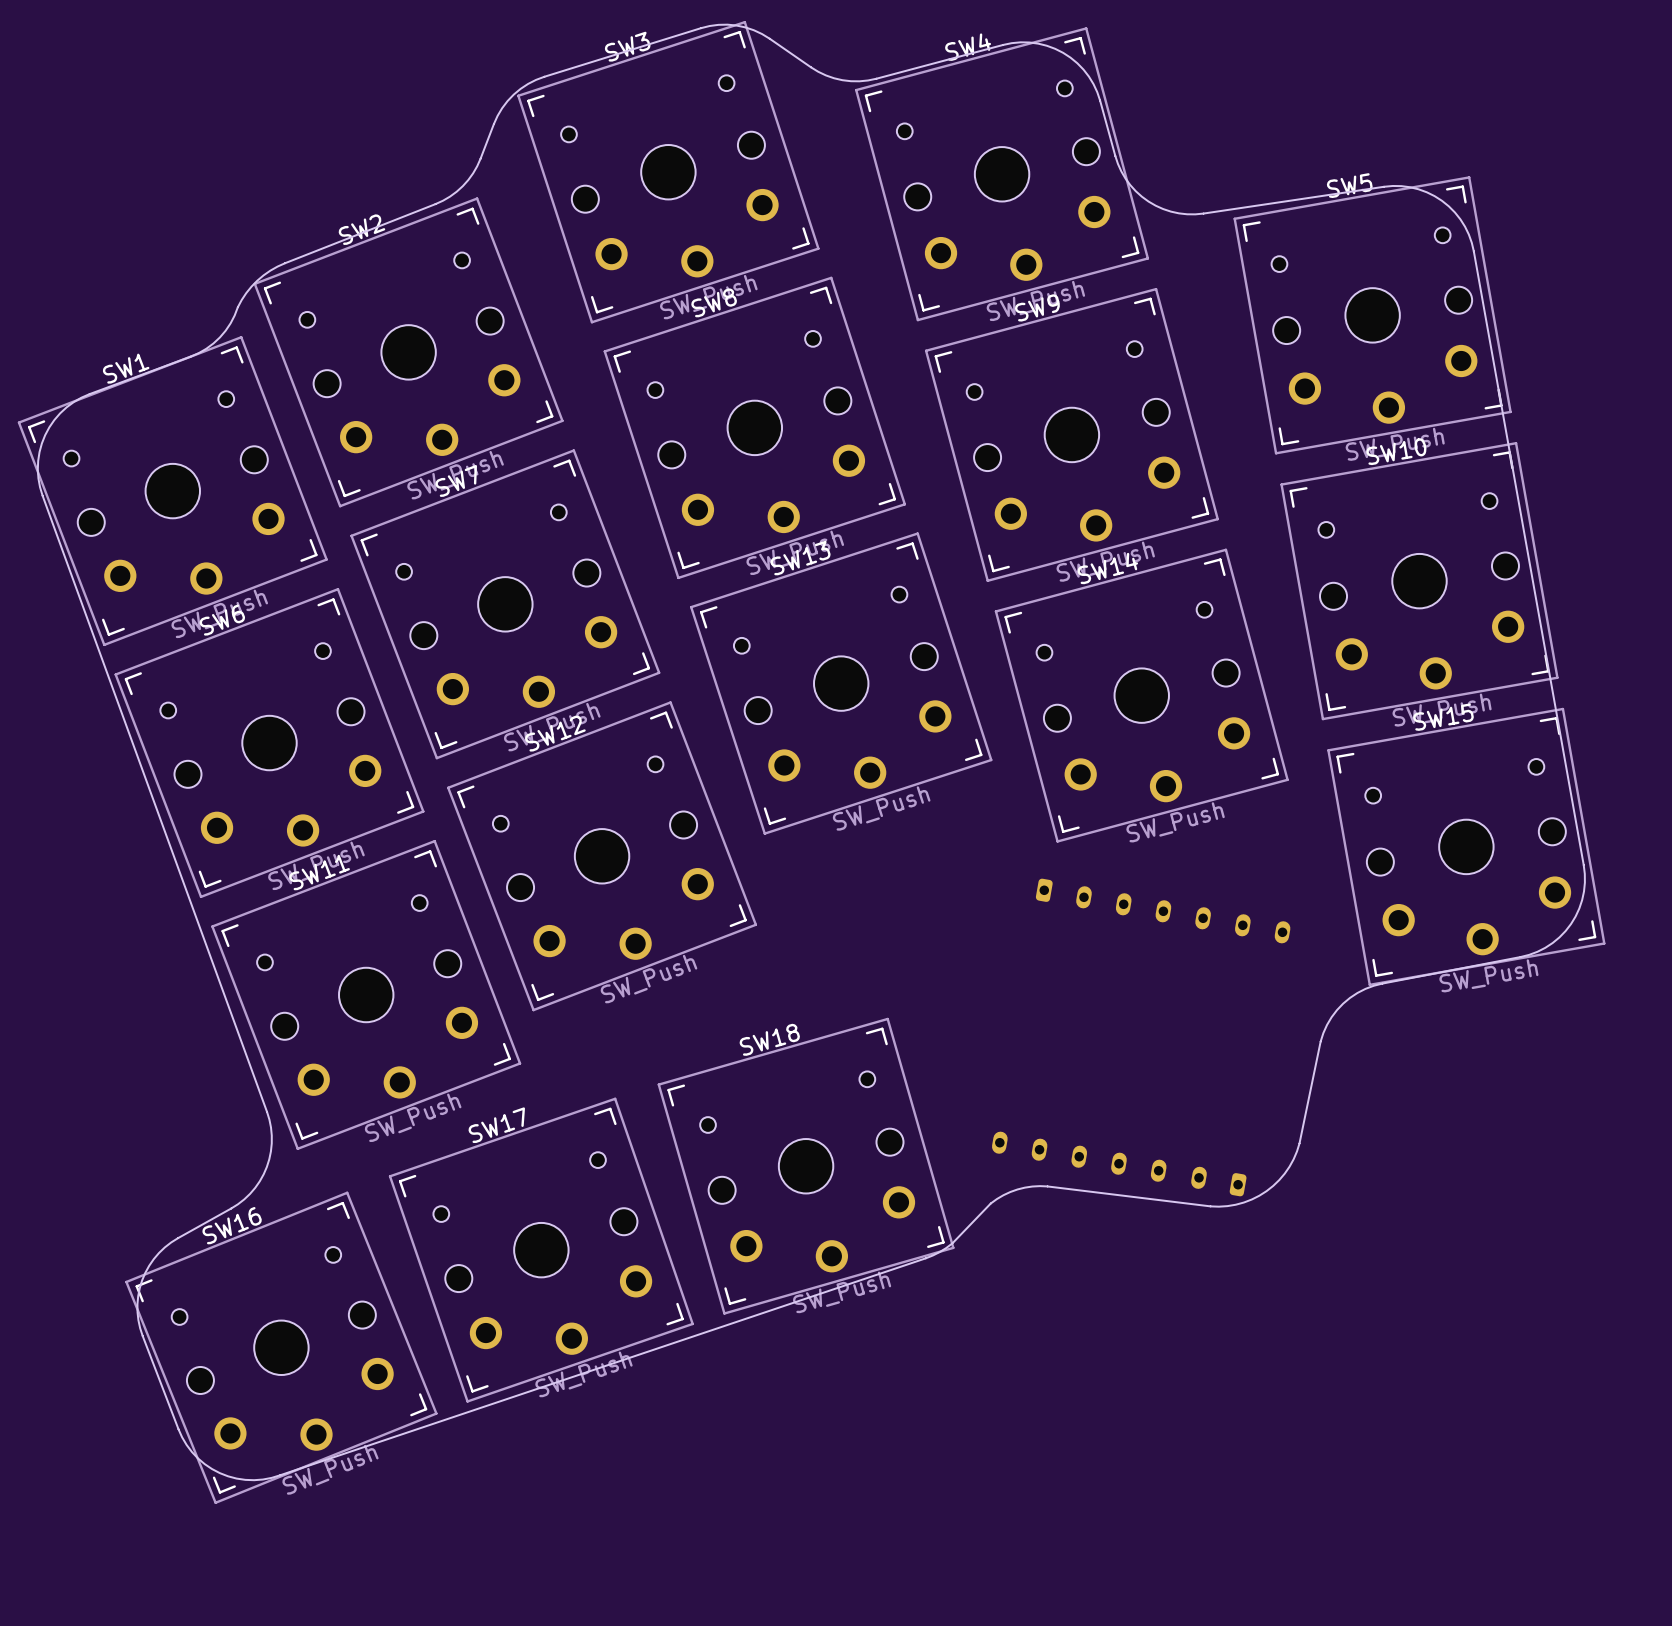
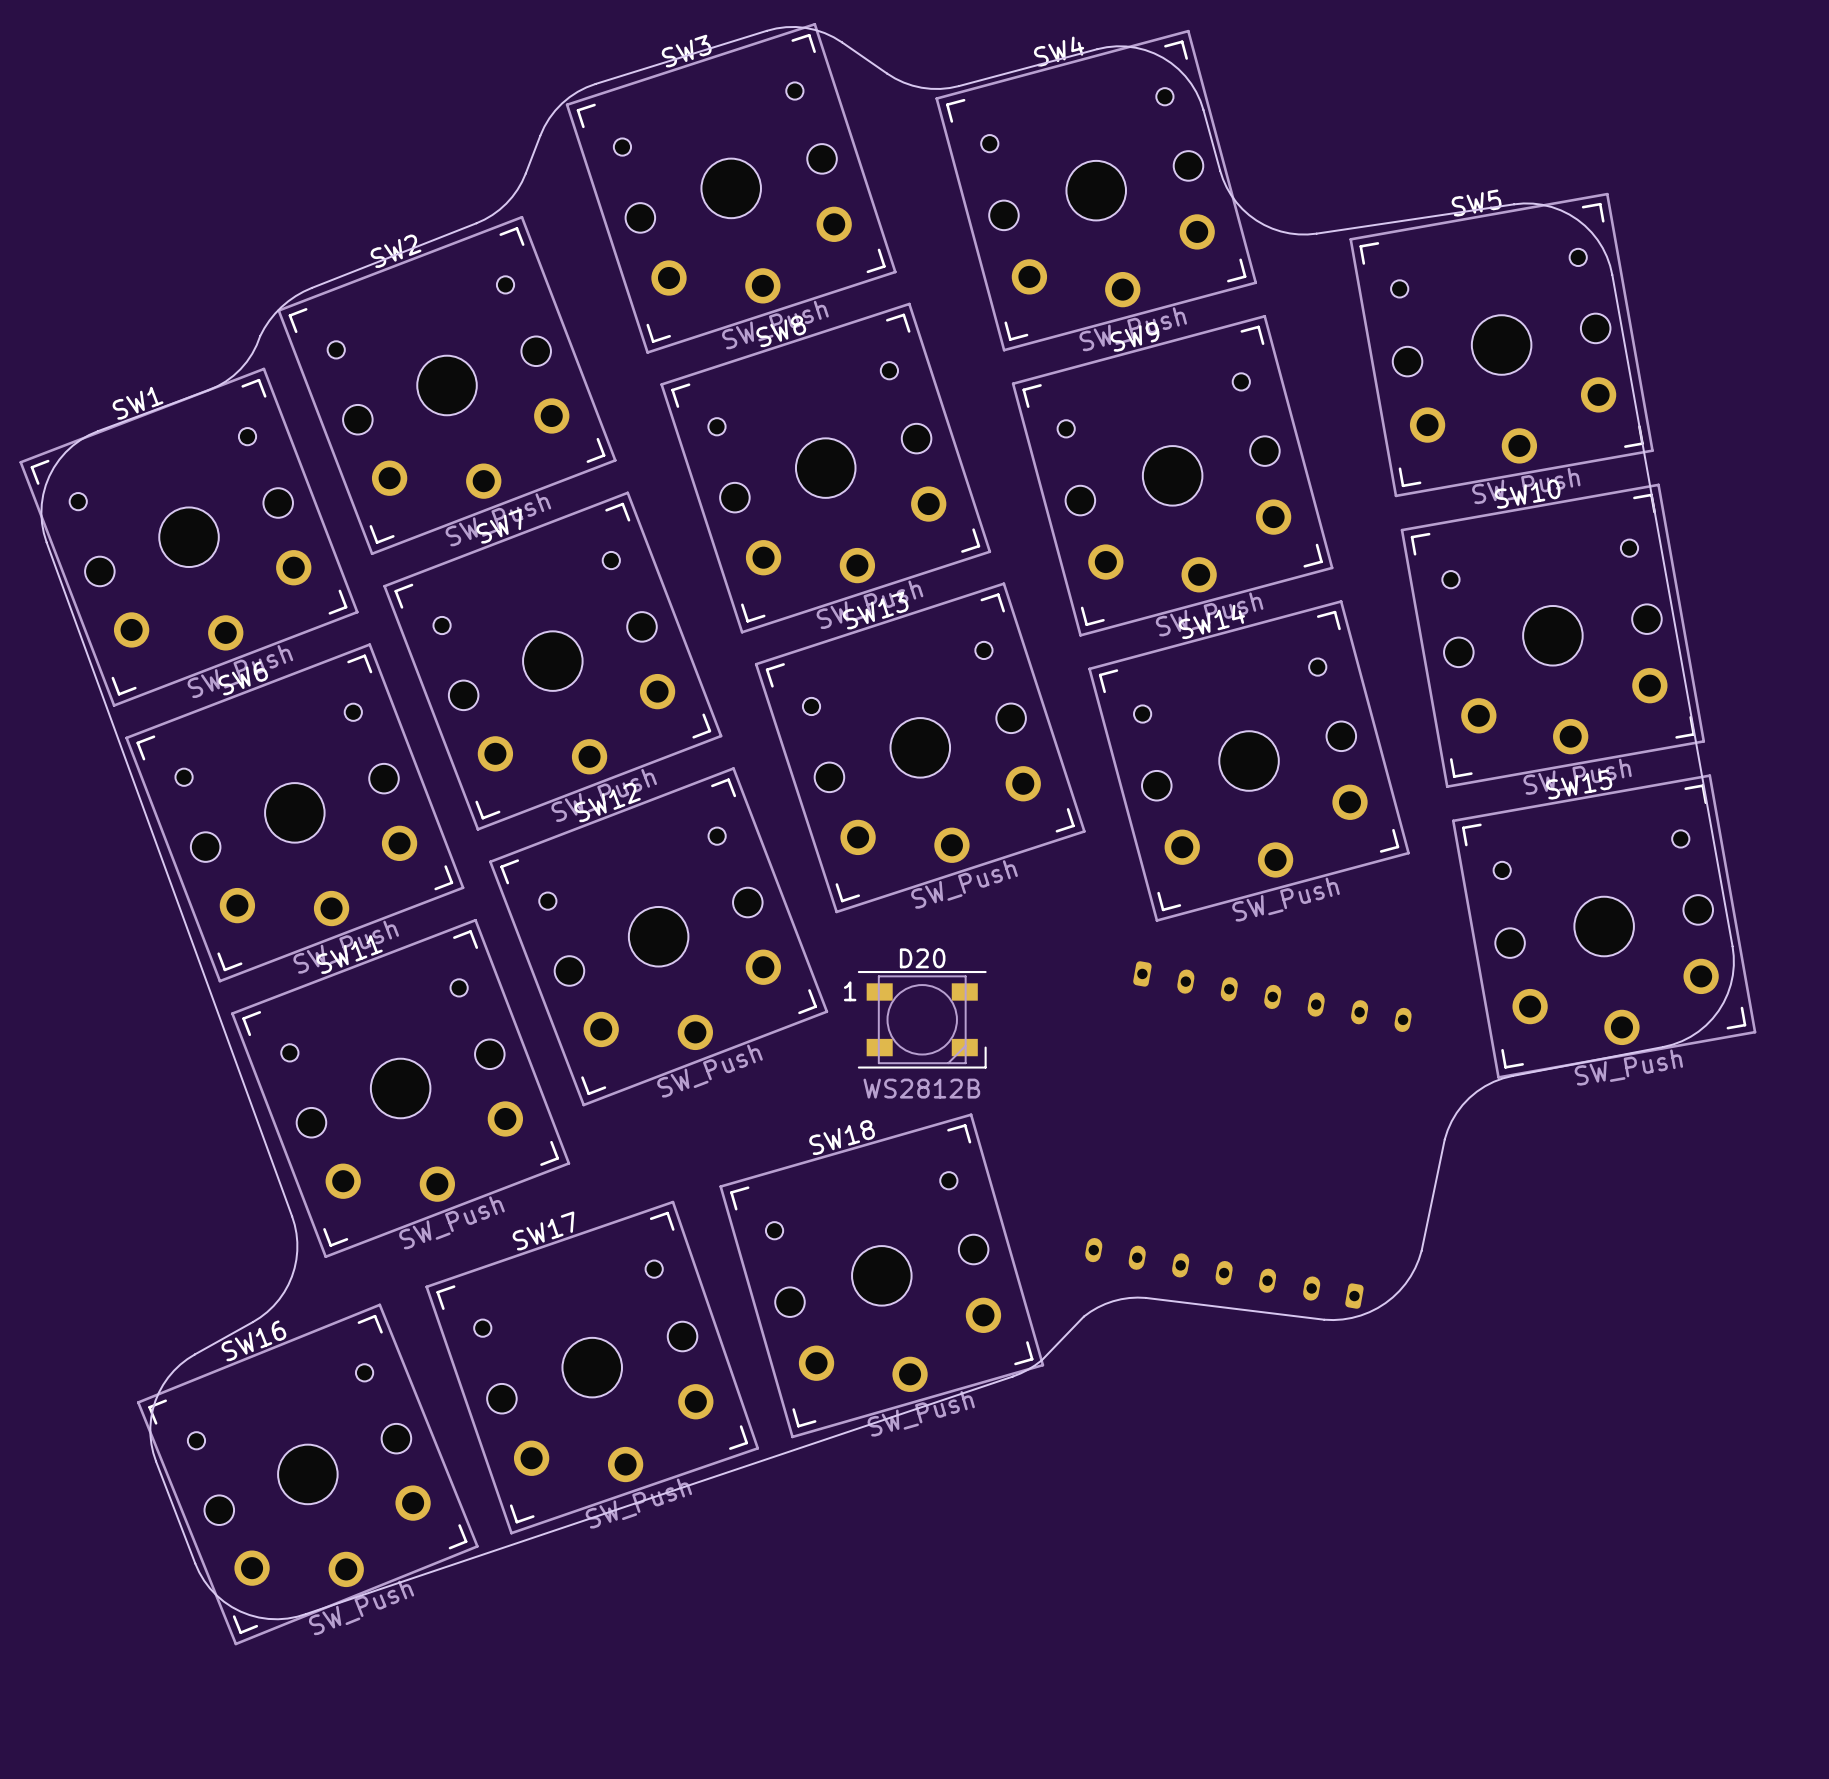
D20: none -> WS2812B (922, 1019)

